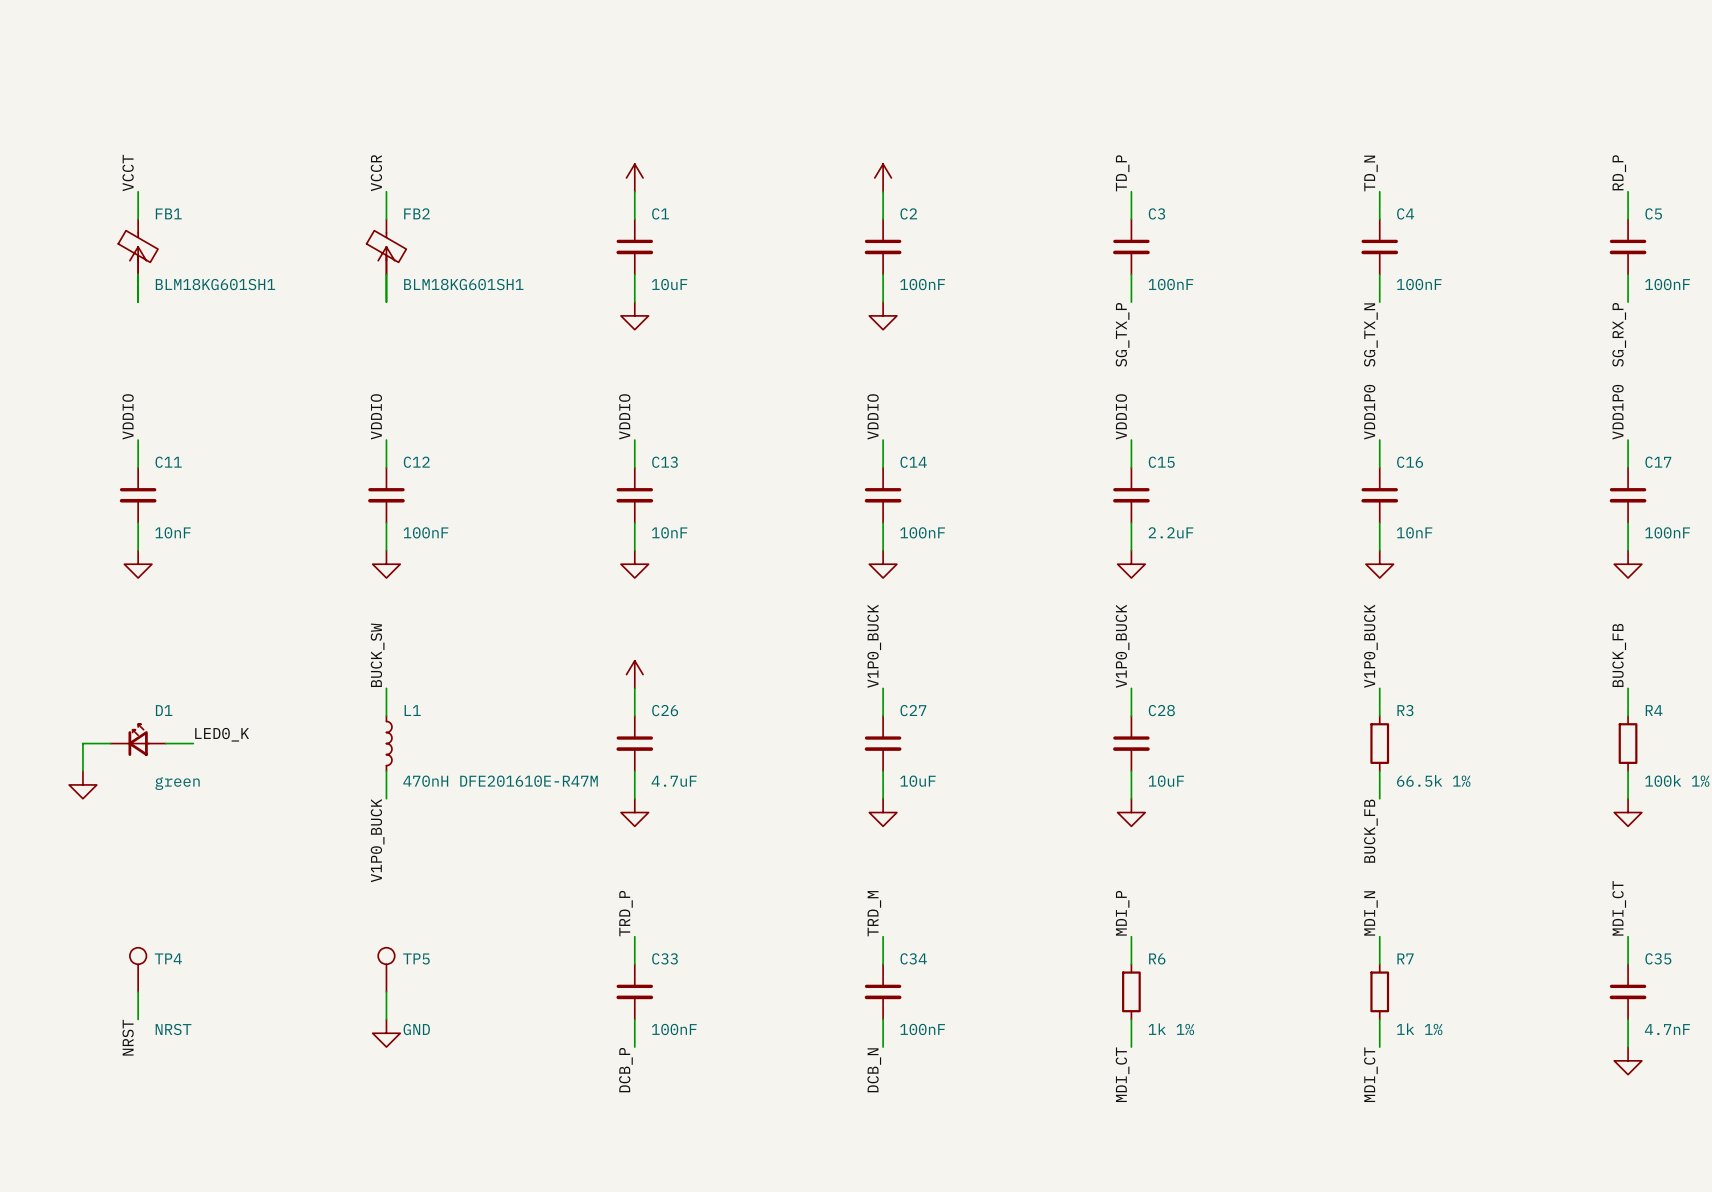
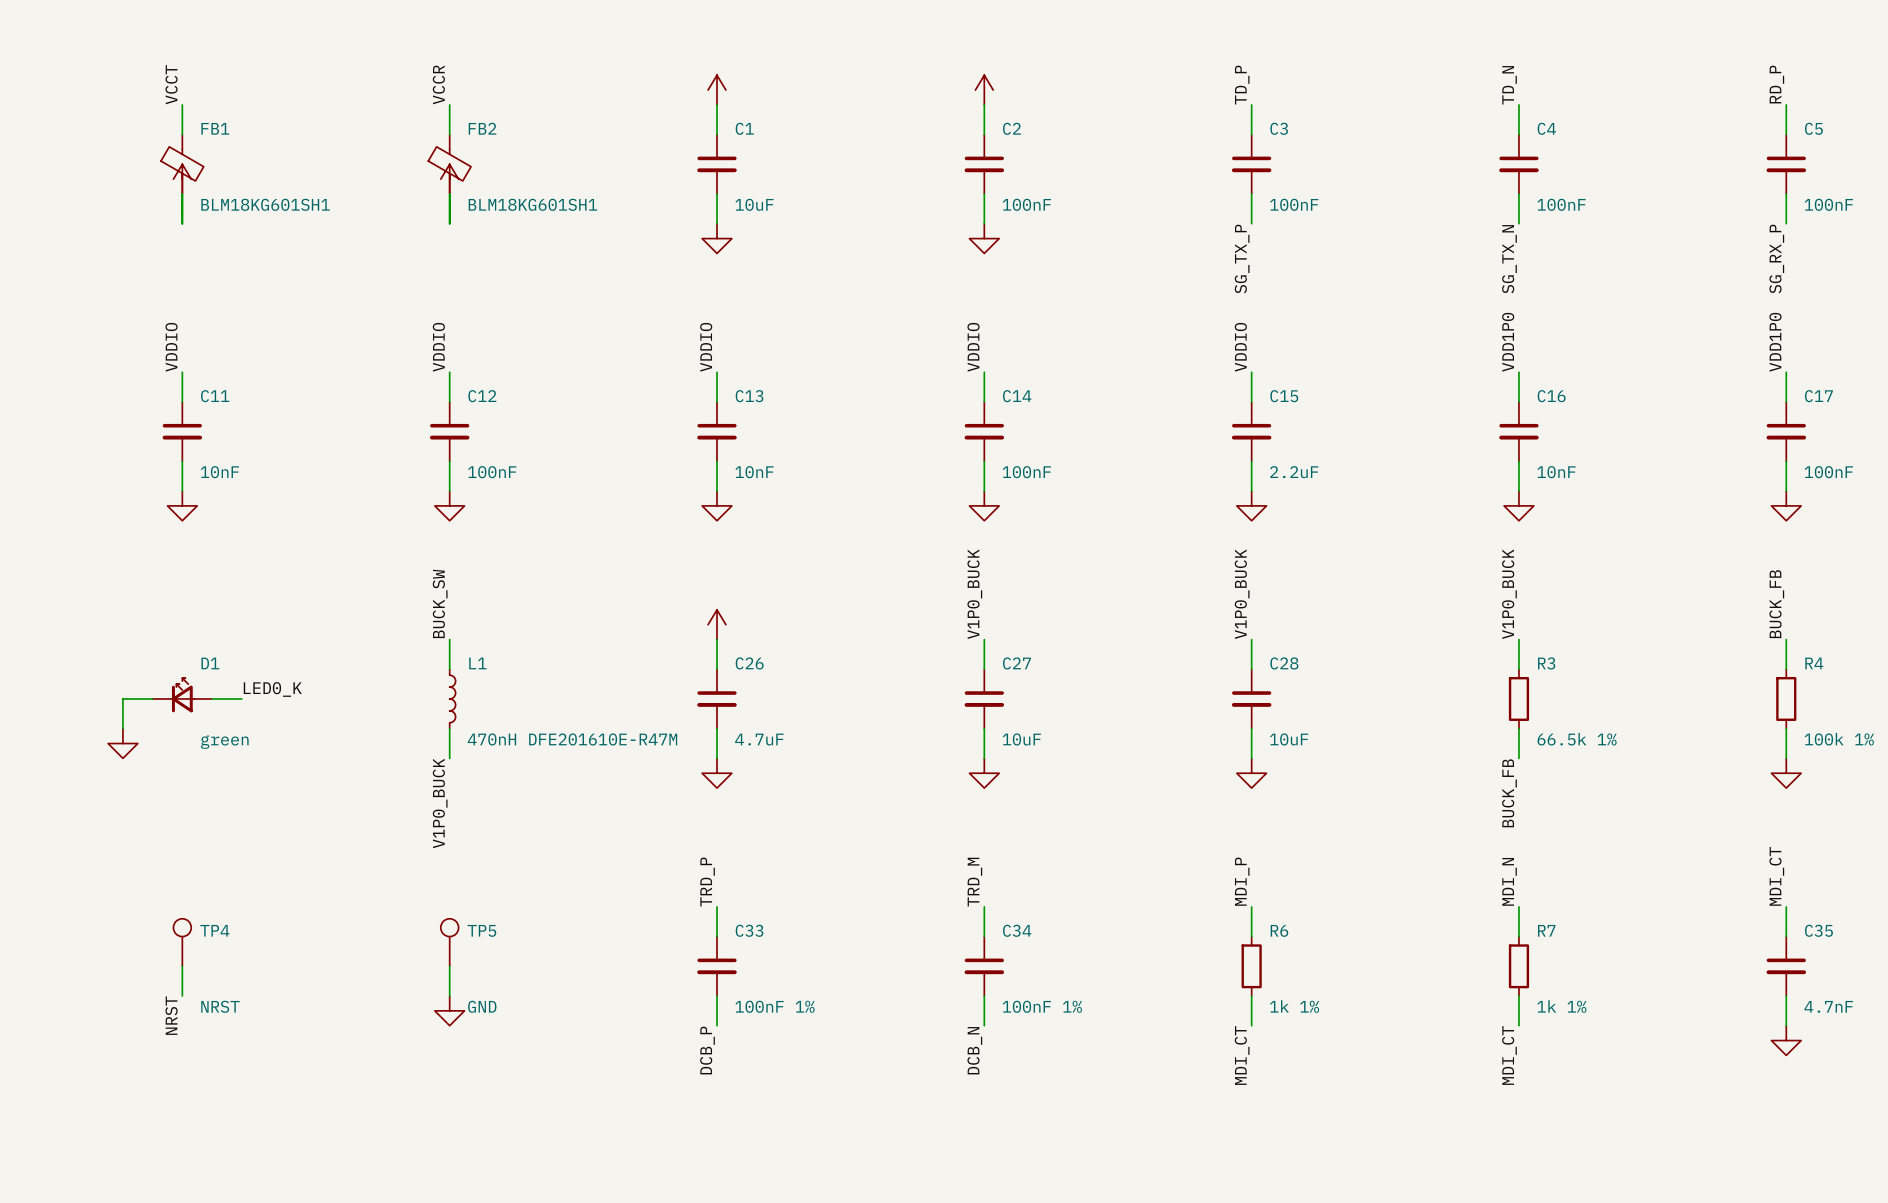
C33 value: 100nF (674, 1029) -> 100nF 1% (775, 1006)
C34 value: 100nF (922, 1029) -> 100nF 1% (1042, 1006)

